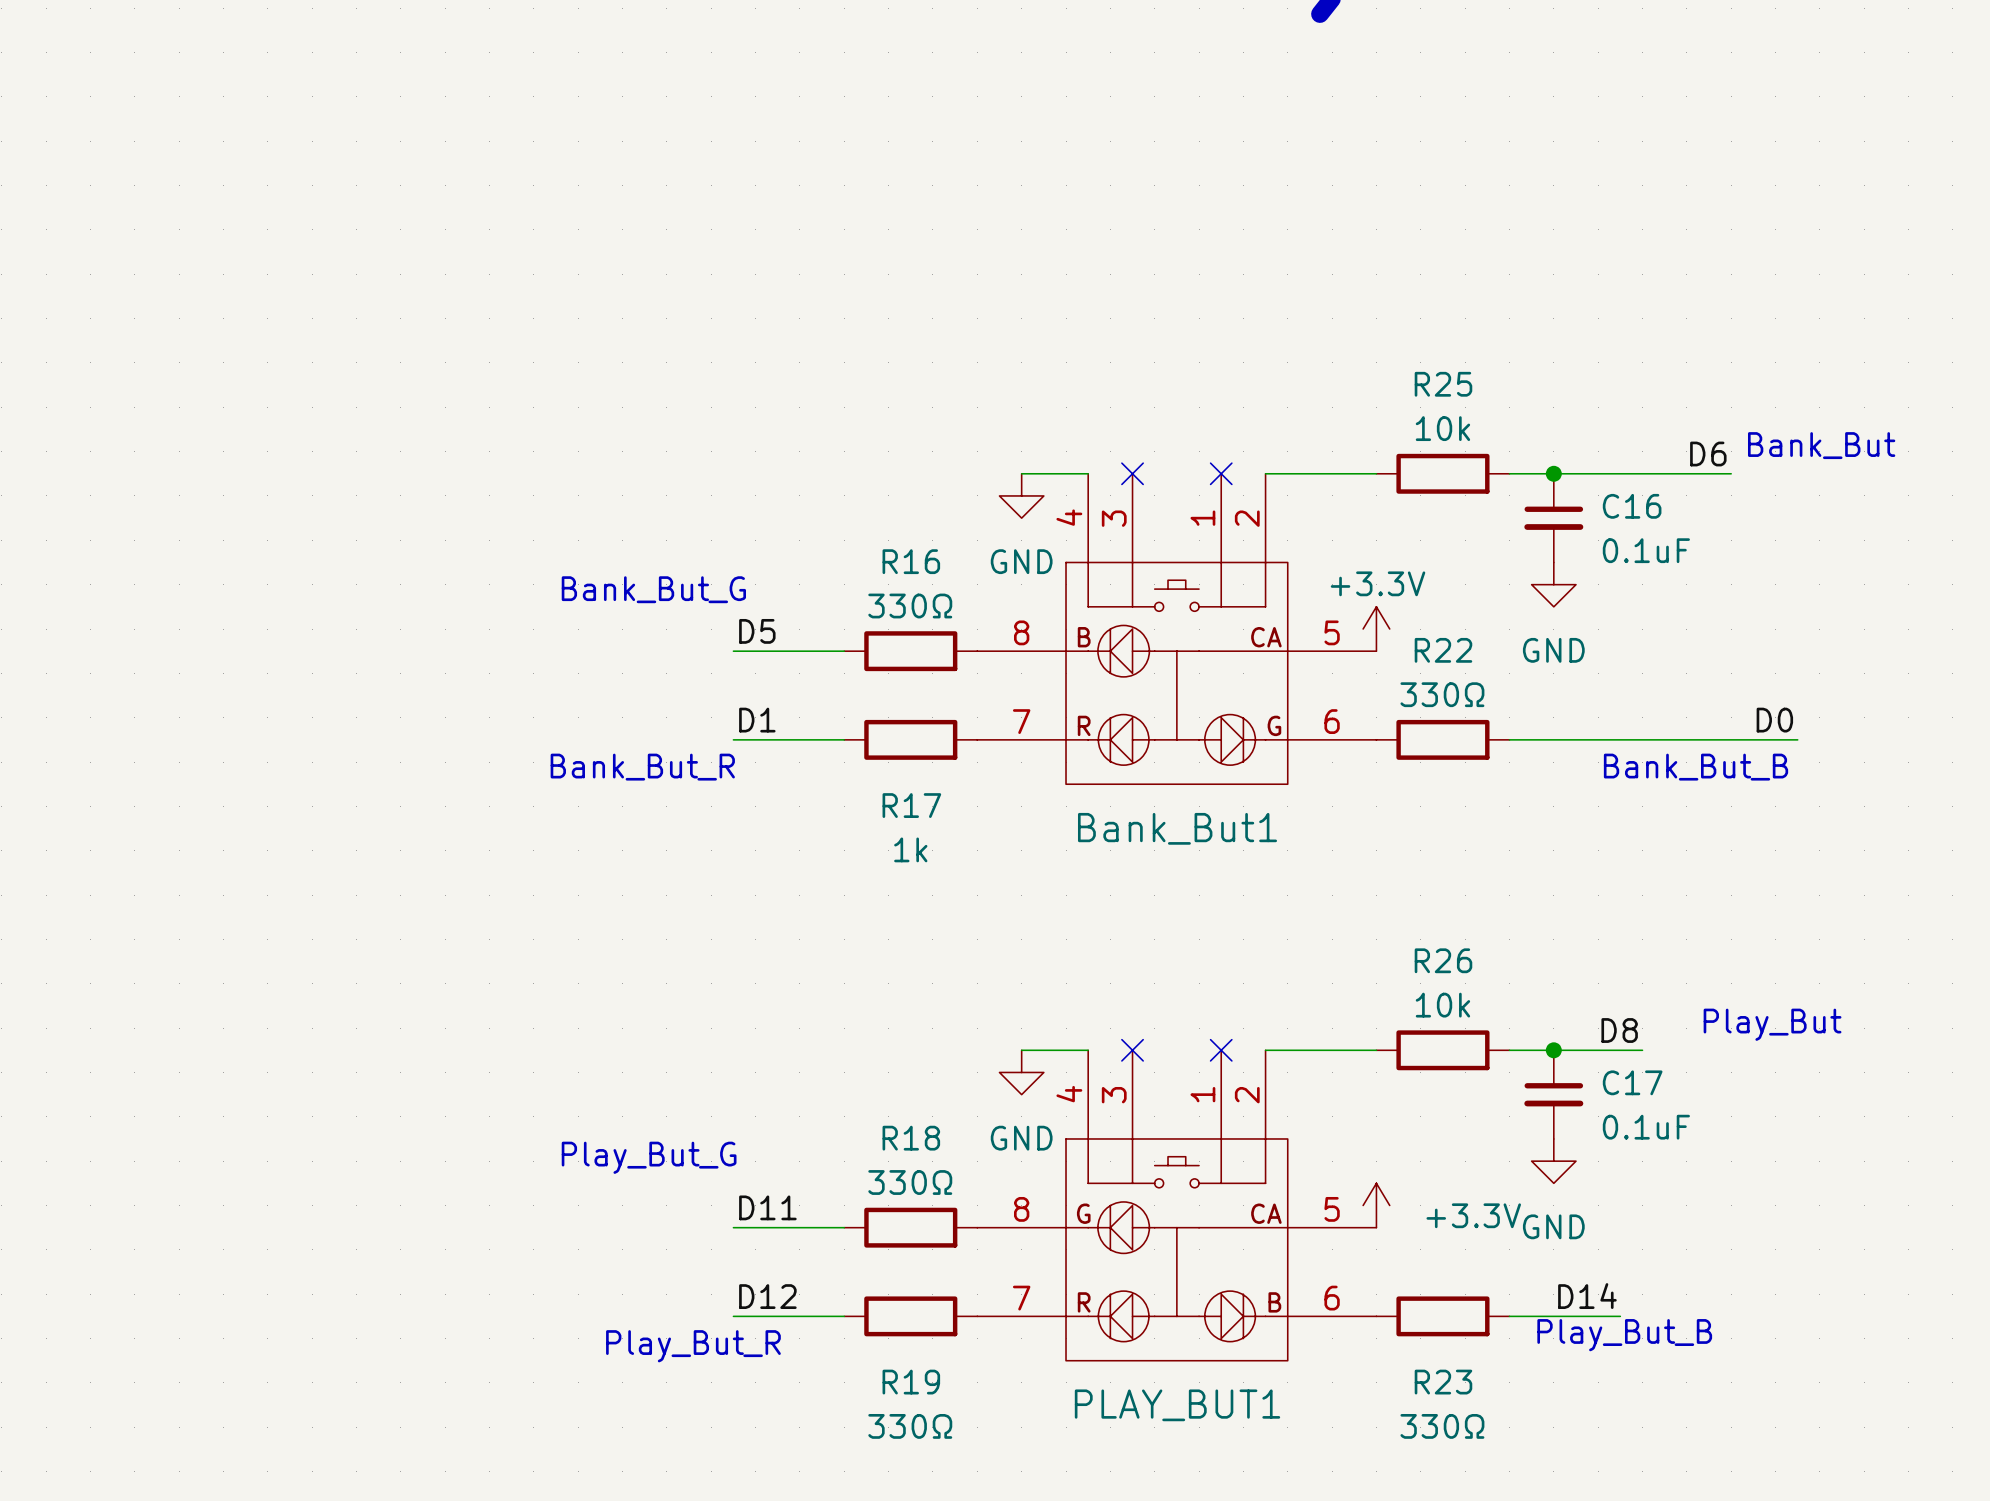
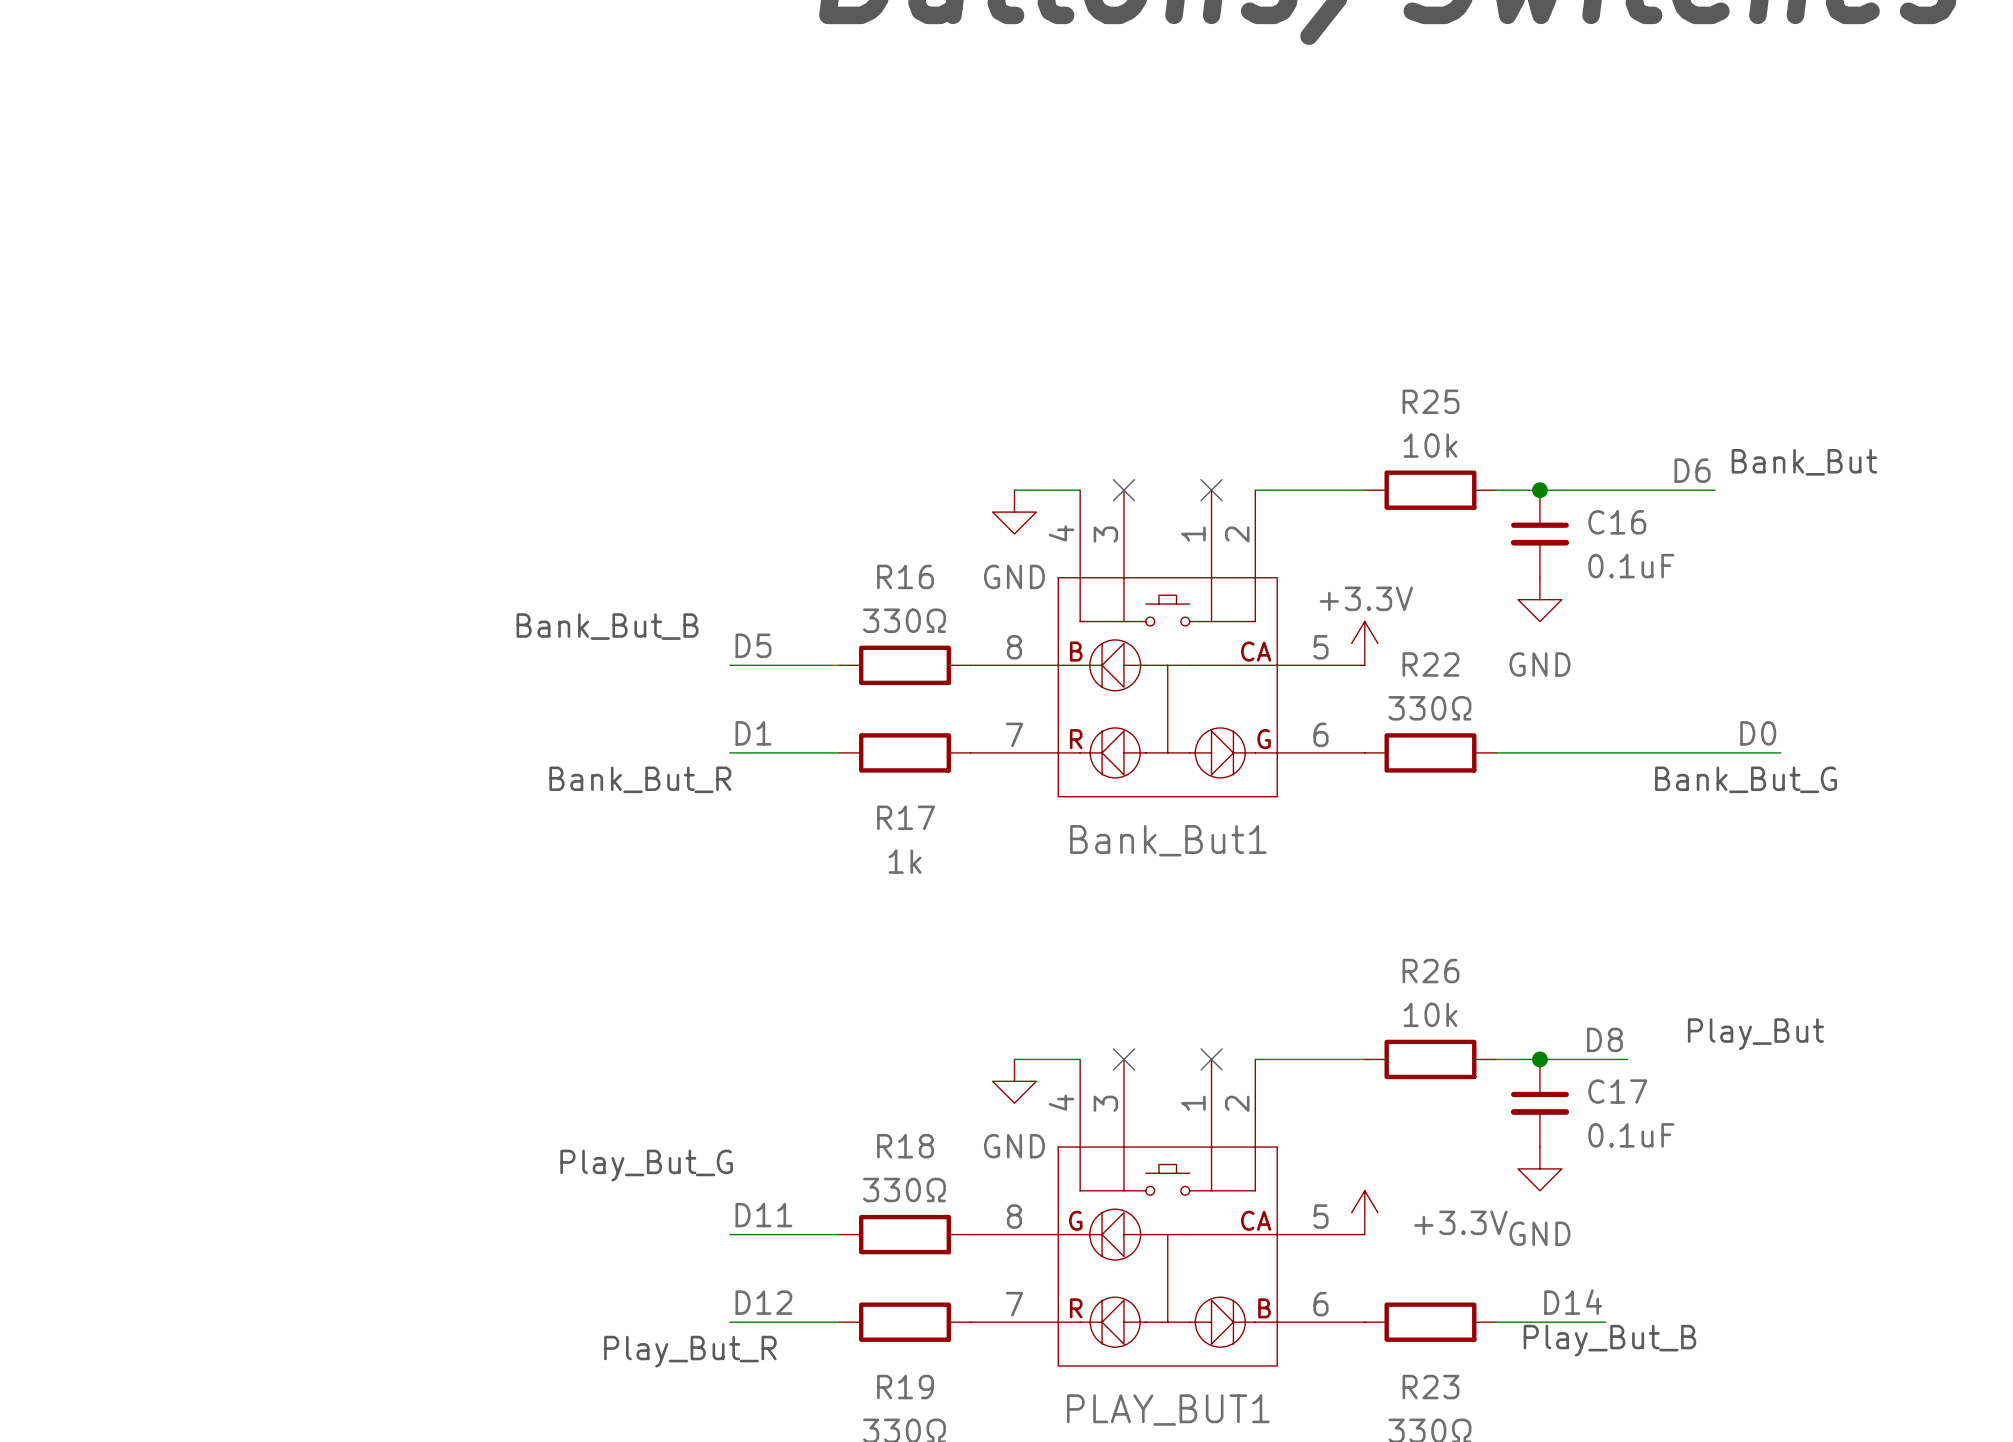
text: Bank_But_G (653, 589) -> Bank_But_B (607, 626)
text: Bank_But_B (1696, 767) -> Bank_But_G (1746, 779)

